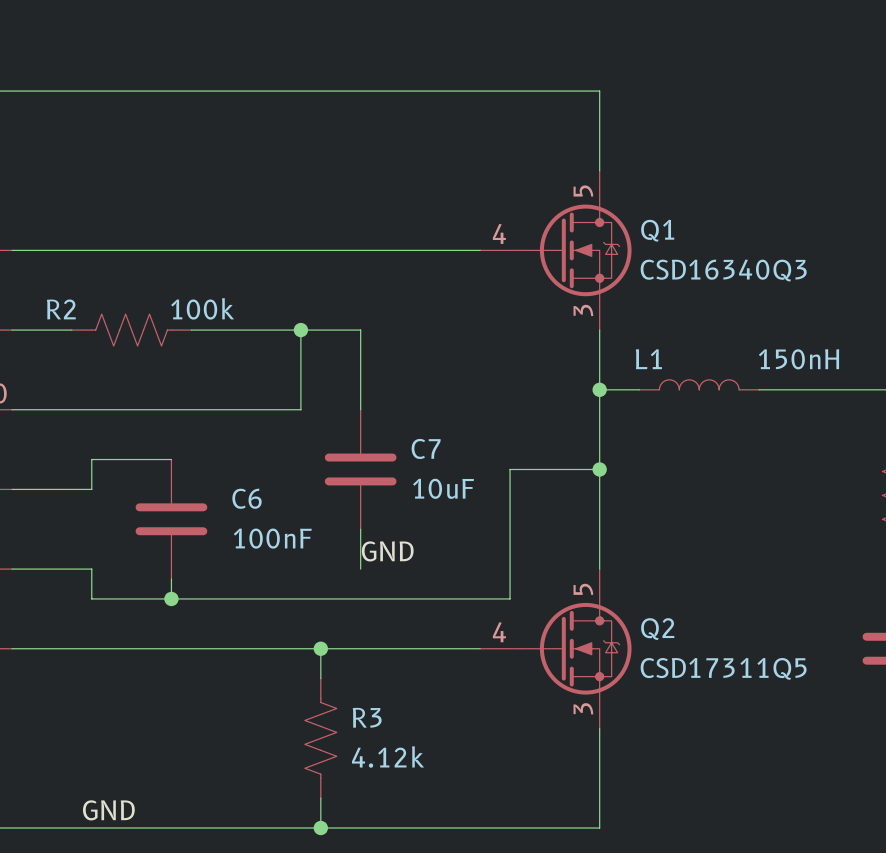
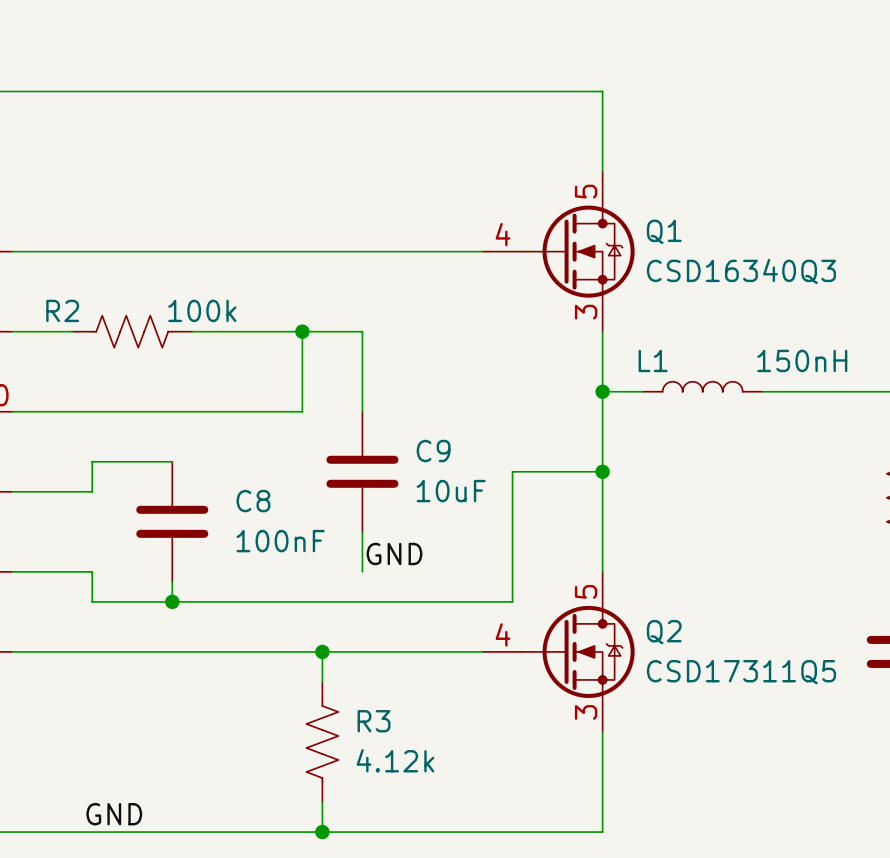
C7 name: C7 (426, 448) -> C9 (433, 451)
C6 name: C6 (247, 498) -> C8 (253, 501)

